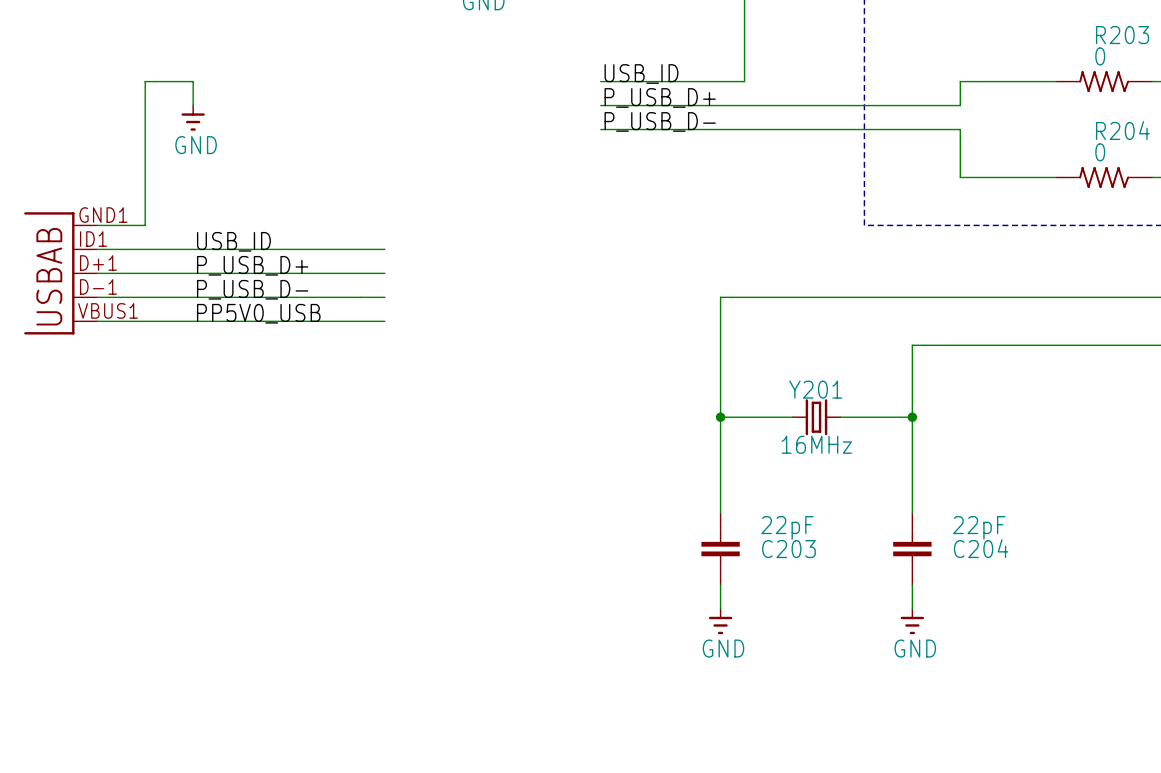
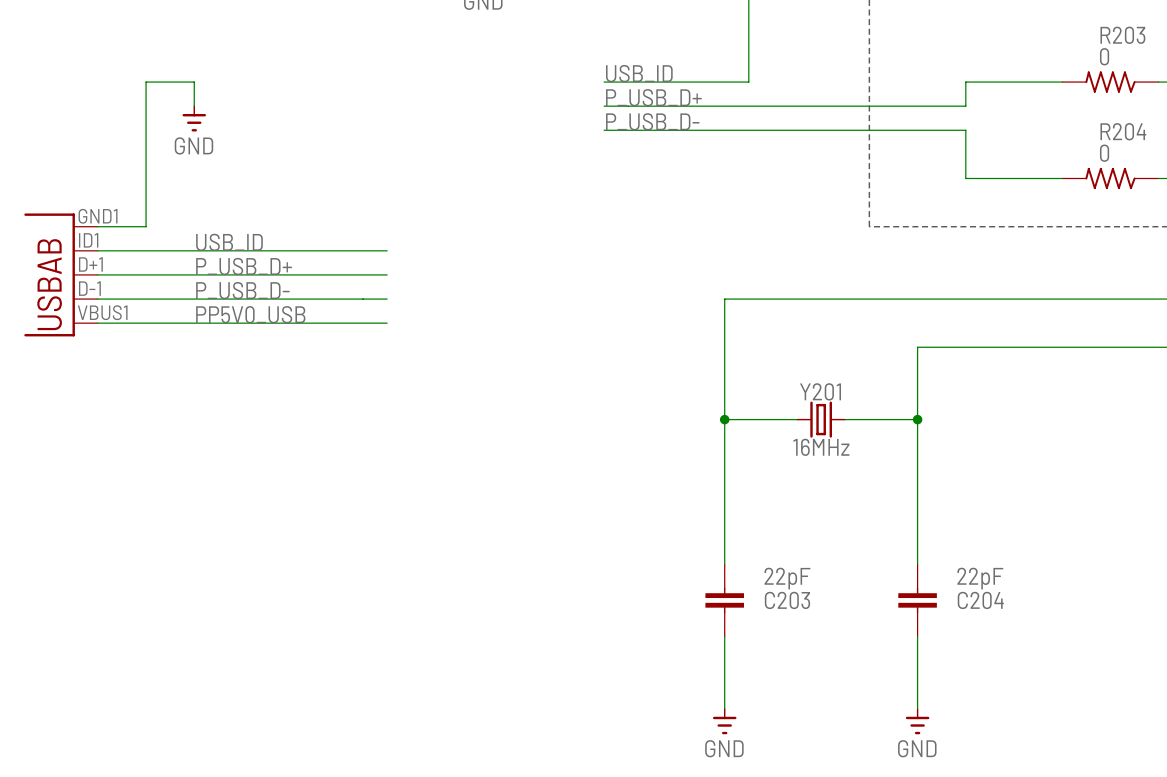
C203 position: (720, 549) -> (724, 600)
C204 position: (912, 549) -> (917, 600)
power symbol position: GND (720, 621) -> GND (724, 721)
power symbol position: GND (912, 621) -> GND (917, 721)
wire: none -> (724, 636) (724, 708)
wire: none -> (917, 636) (917, 708)

